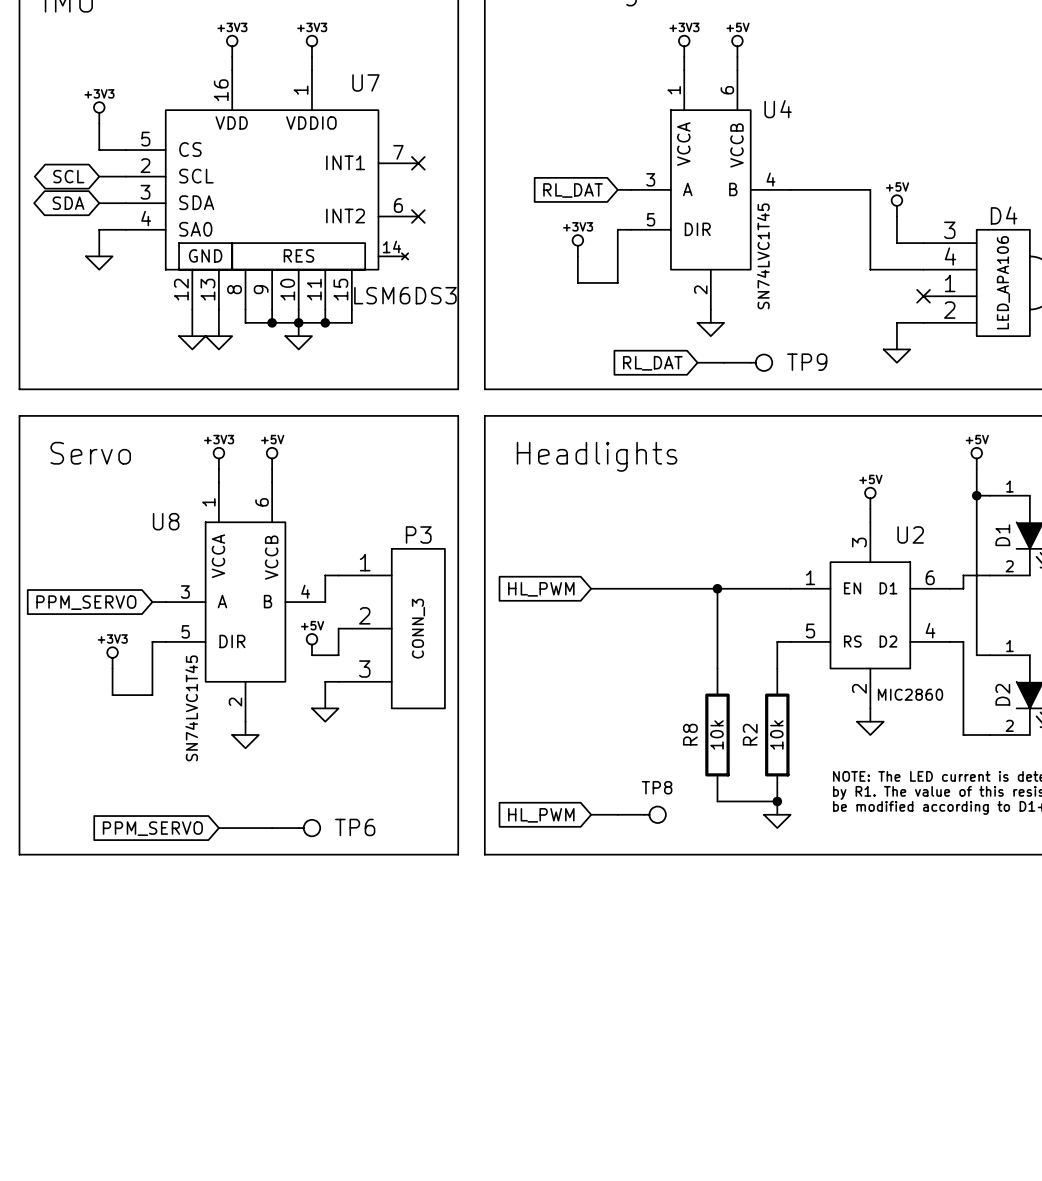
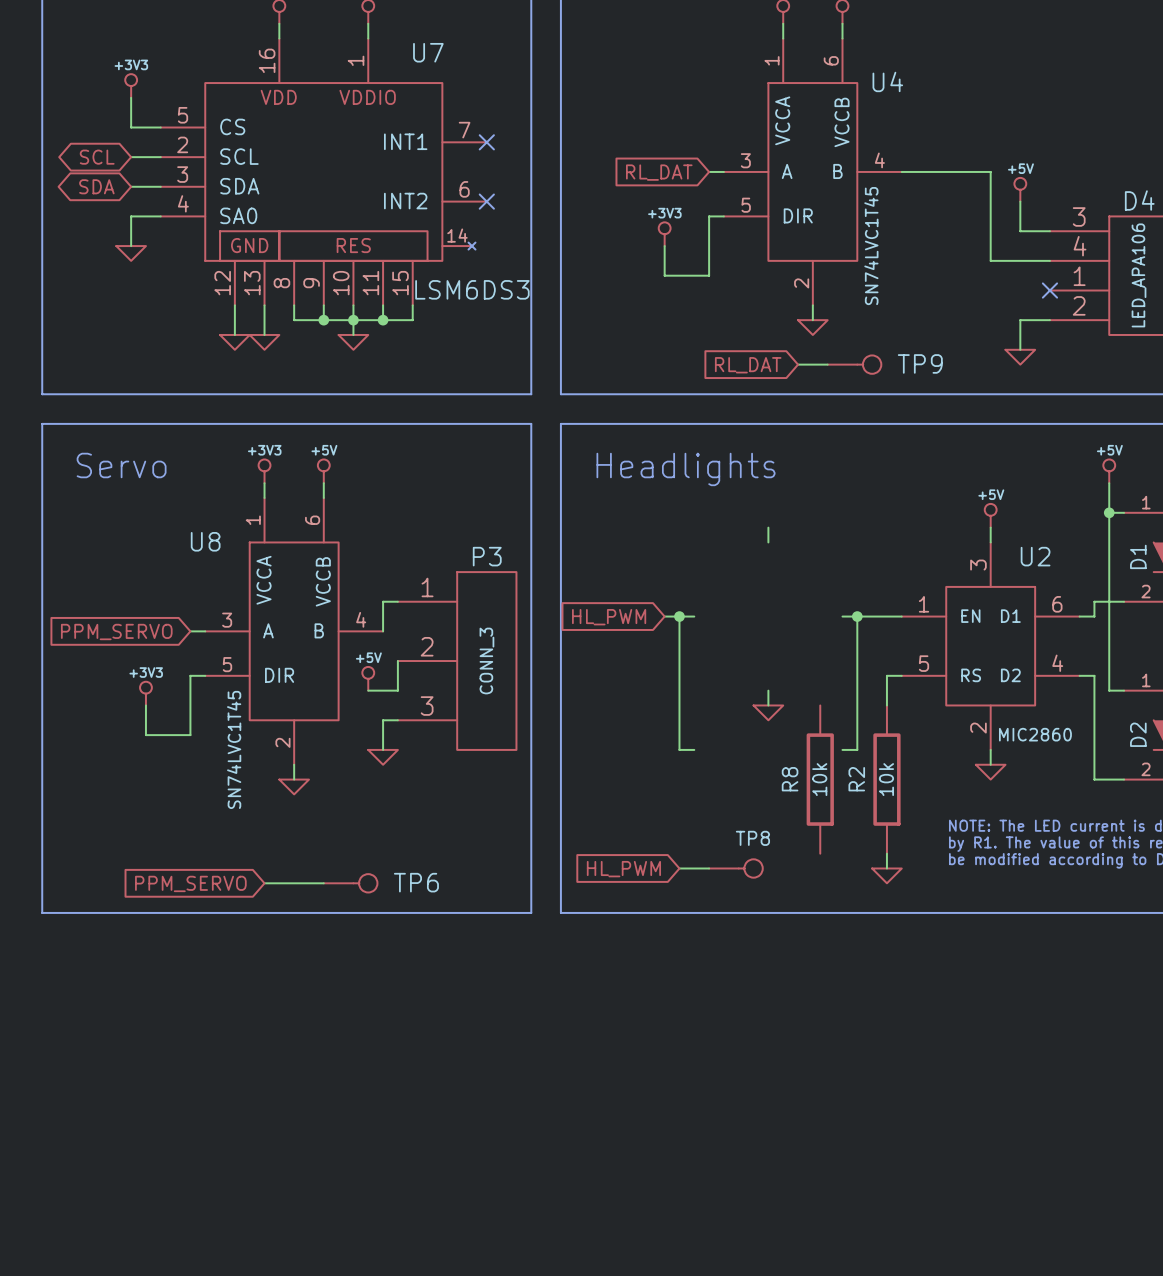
wire: none -> (768, 527) (768, 542)
wire: none -> (664, 616) (679, 616) (679, 749) (694, 749)
junction: none -> (679, 616)
wire: (604, 588) (737, 588) -> none
wire: (717, 588) (717, 668) -> none
junction position: (717, 588) -> (857, 616)
wire: none -> (857, 616) (857, 749) (842, 749)
global label position: HL_PWM (541, 589) -> HL_PWM (609, 617)
wire: none -> (768, 690) (768, 705)
power symbol: none -> (768, 712)
wire: (717, 801) (777, 801) -> none
junction: (777, 801) -> none

